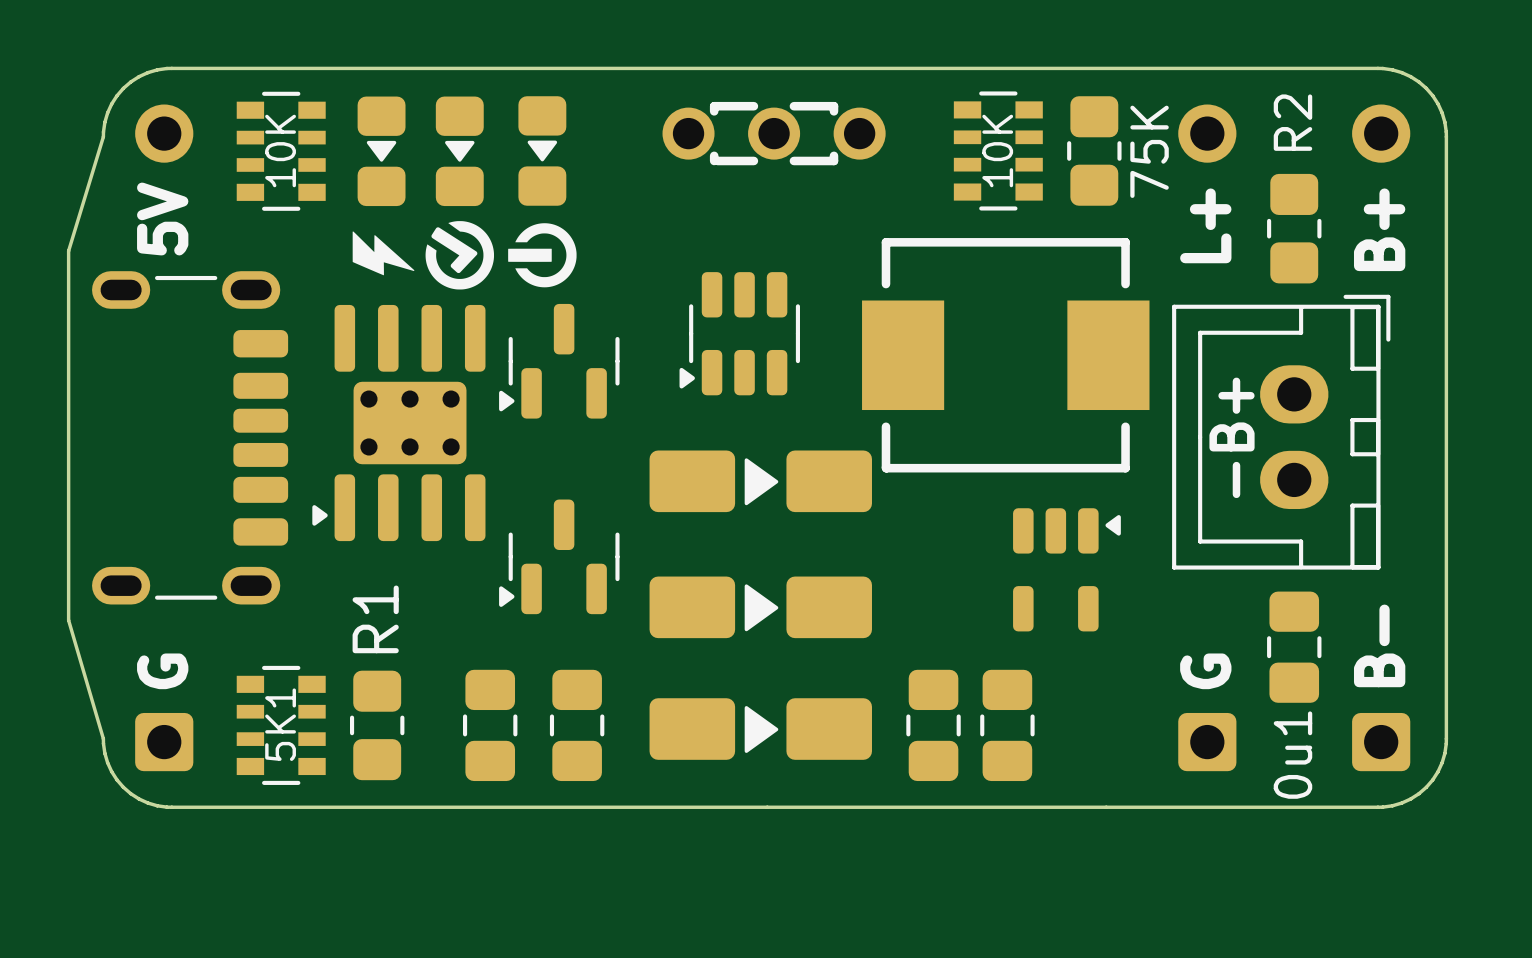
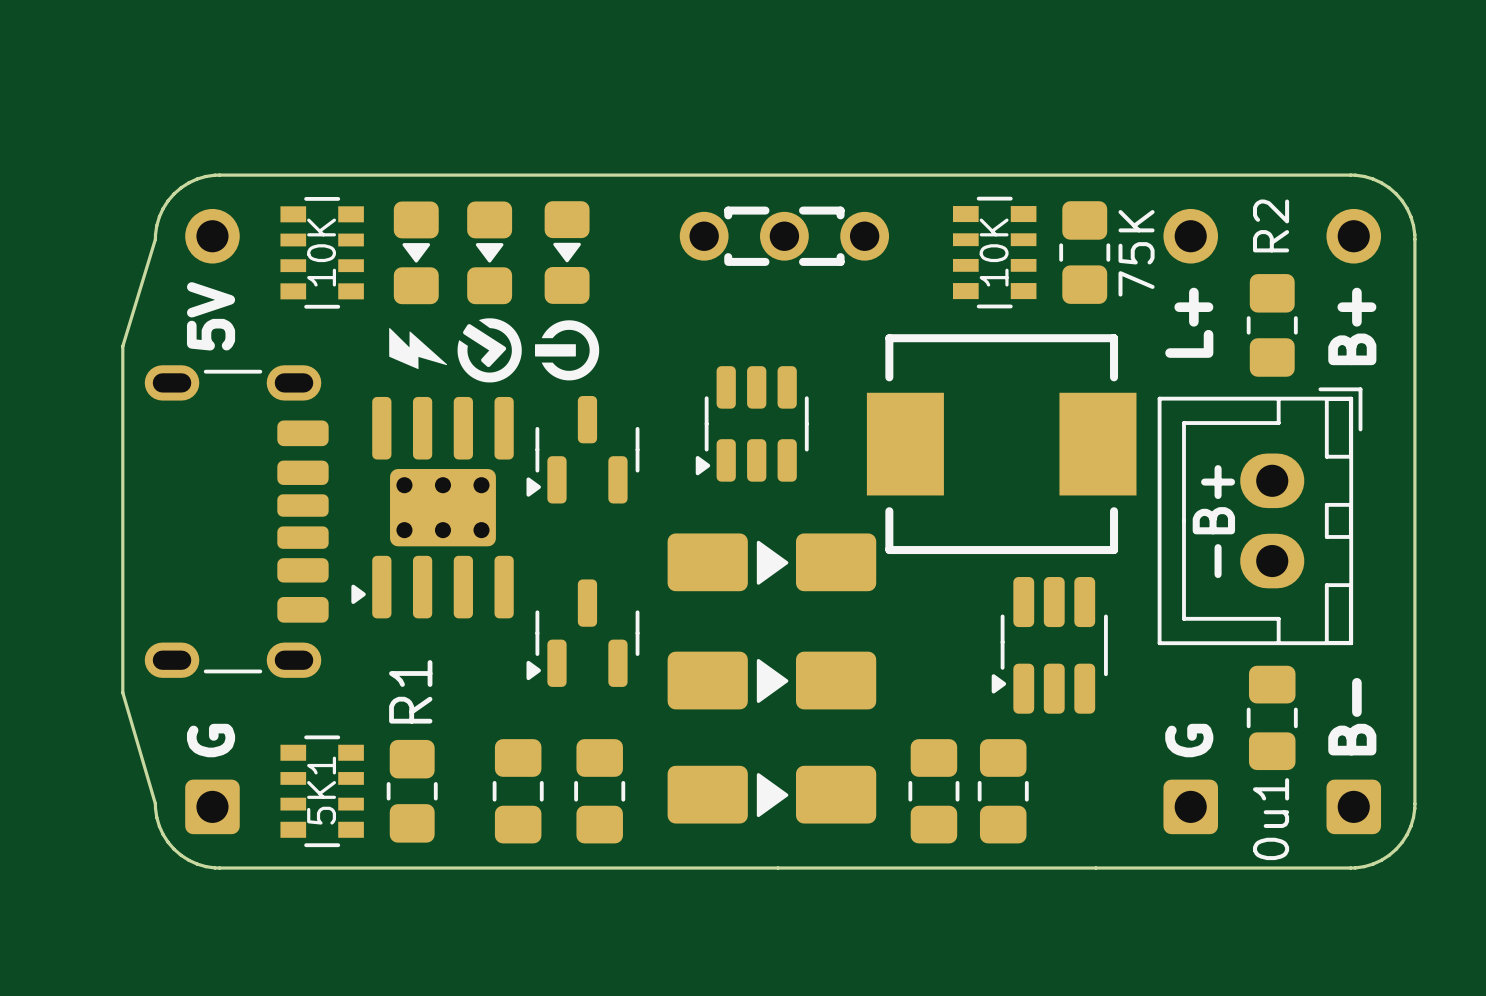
part footprint: [1013, 508, 1121, 632] -> [991, 576, 1108, 714]

